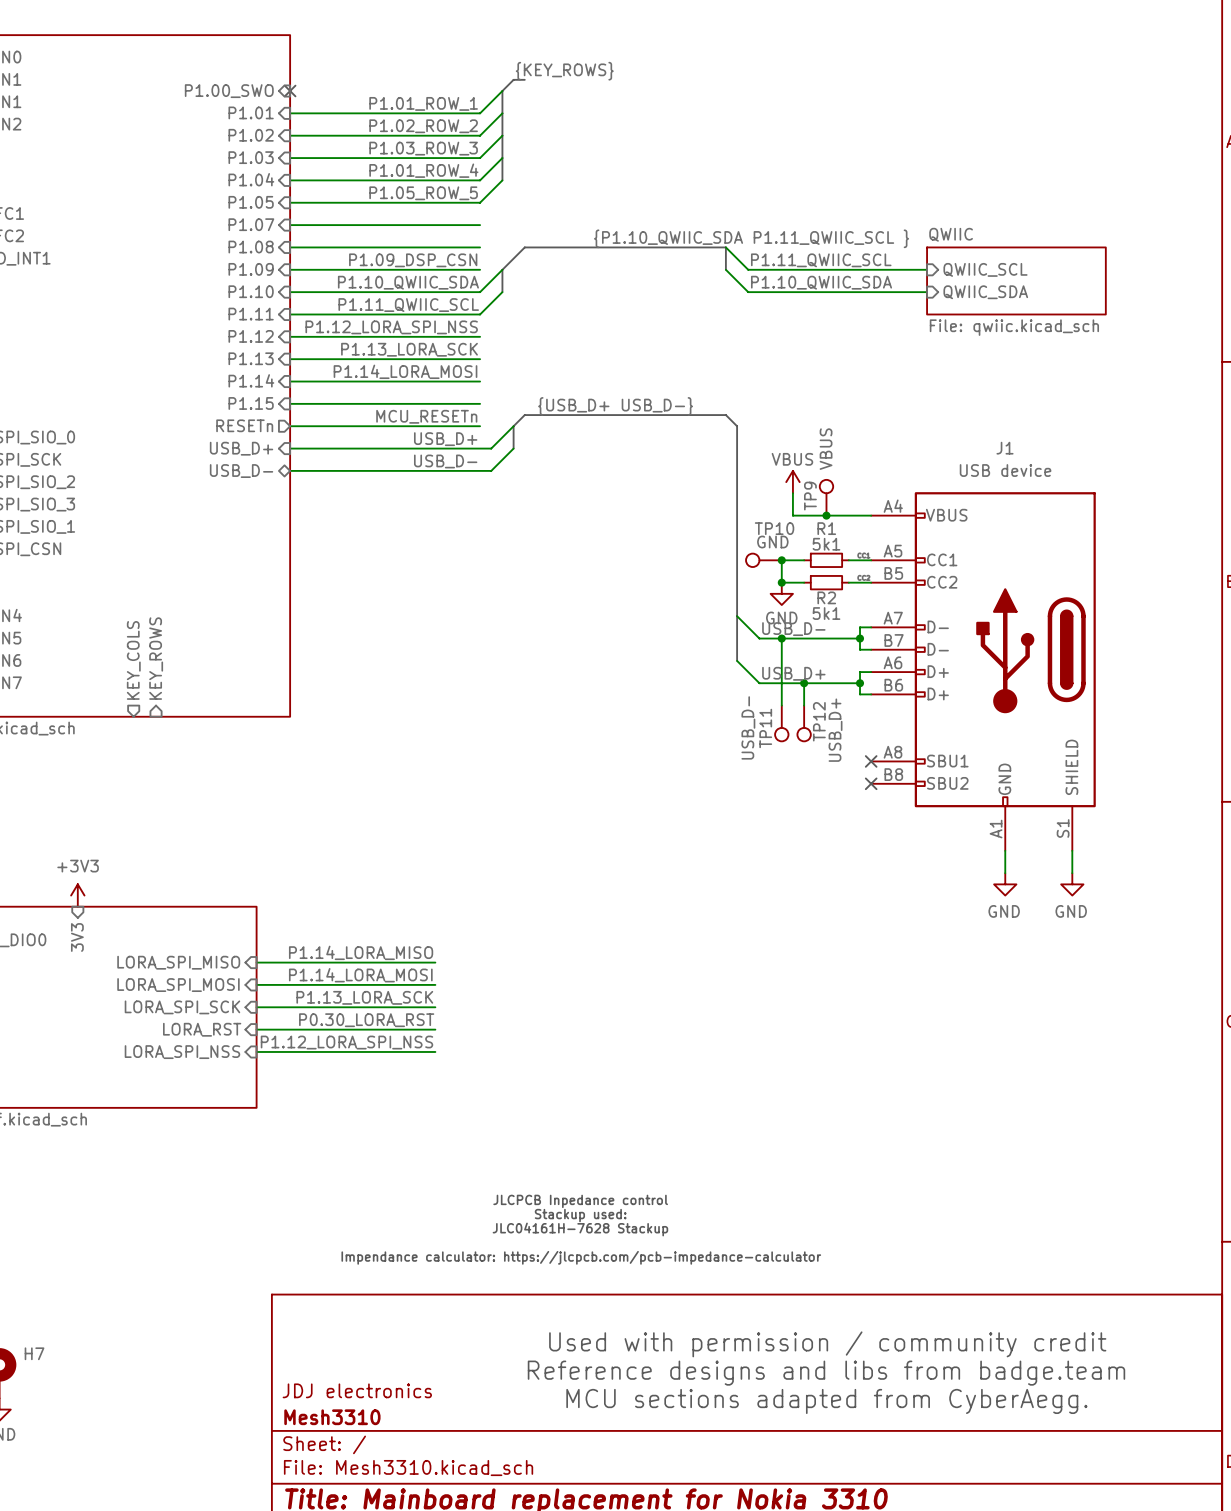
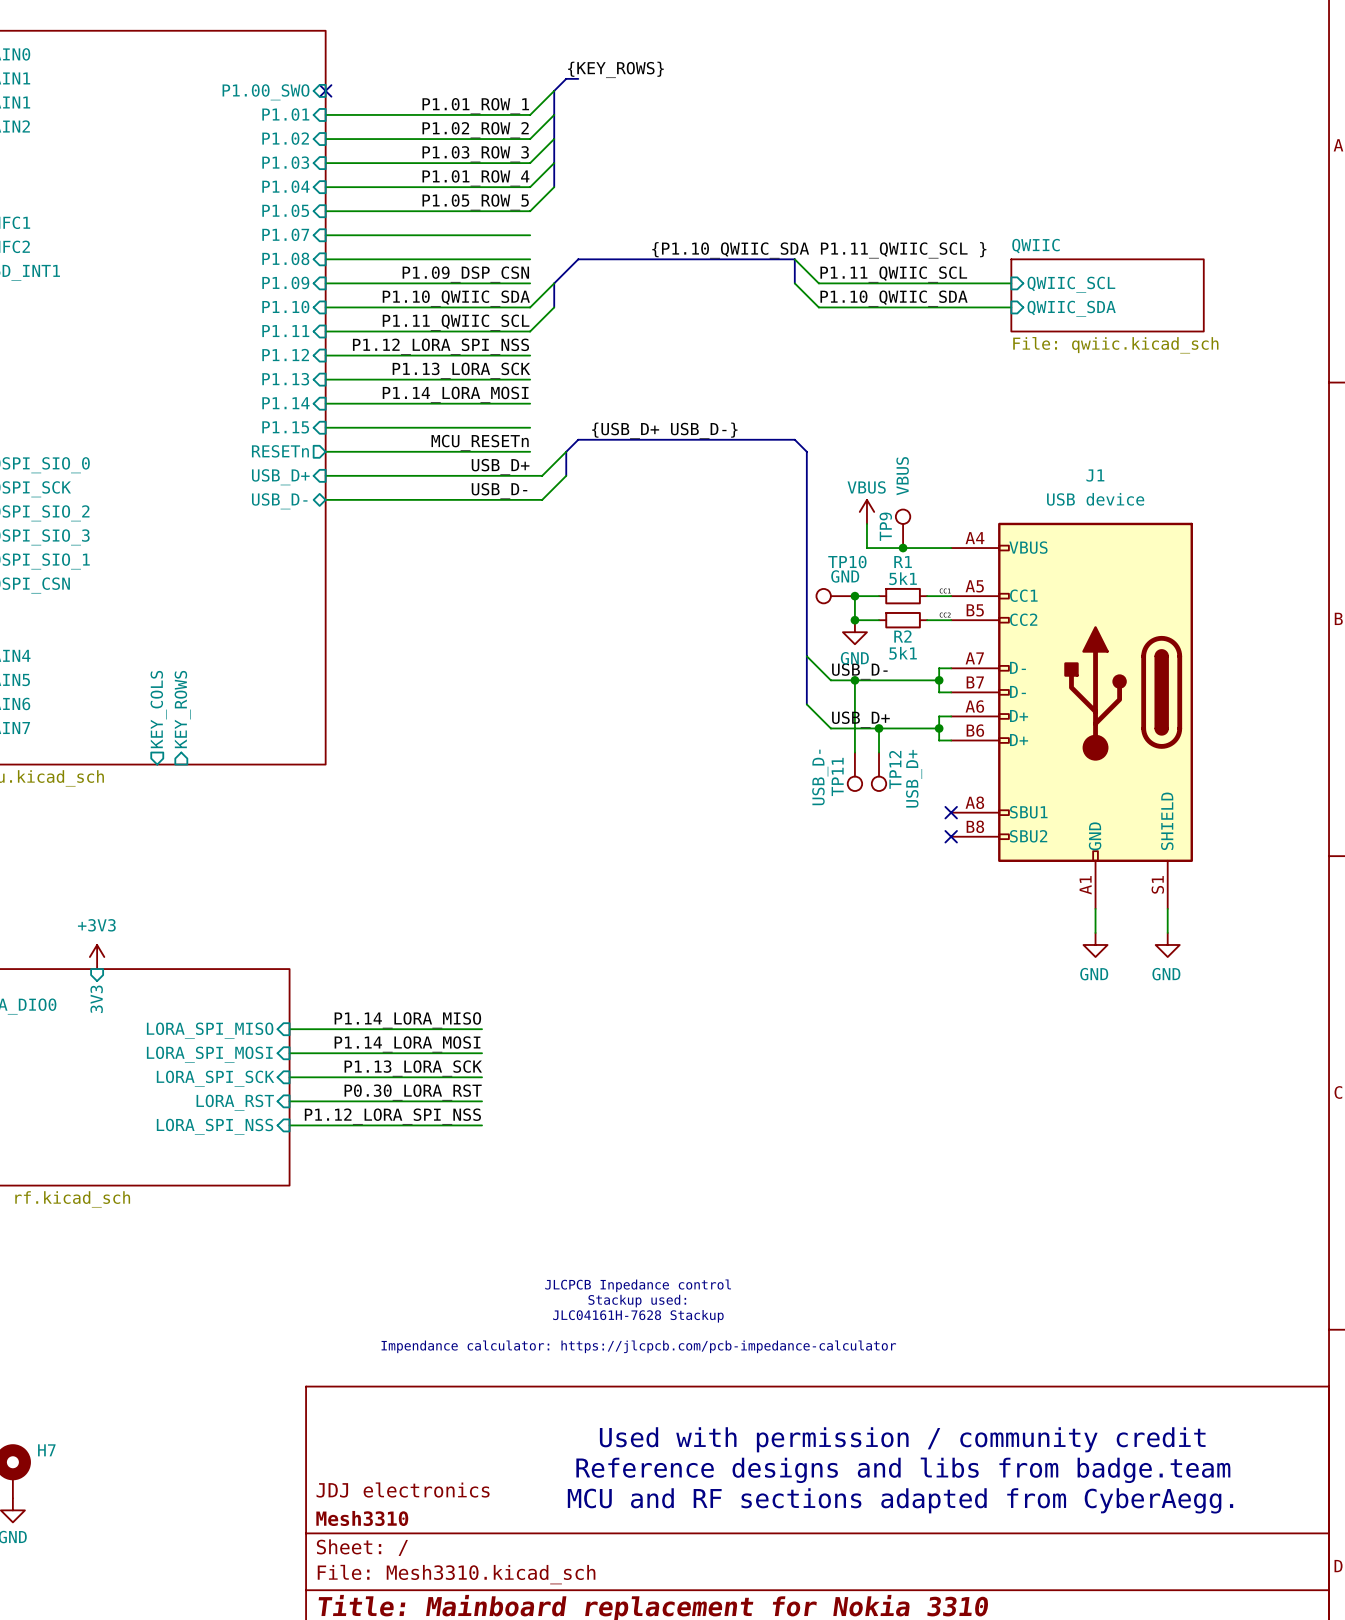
text: MCU sections adapted from CyberAegg. (826, 1401) -> MCU and RF sections adapted from CyberAegg. (900, 1500)

